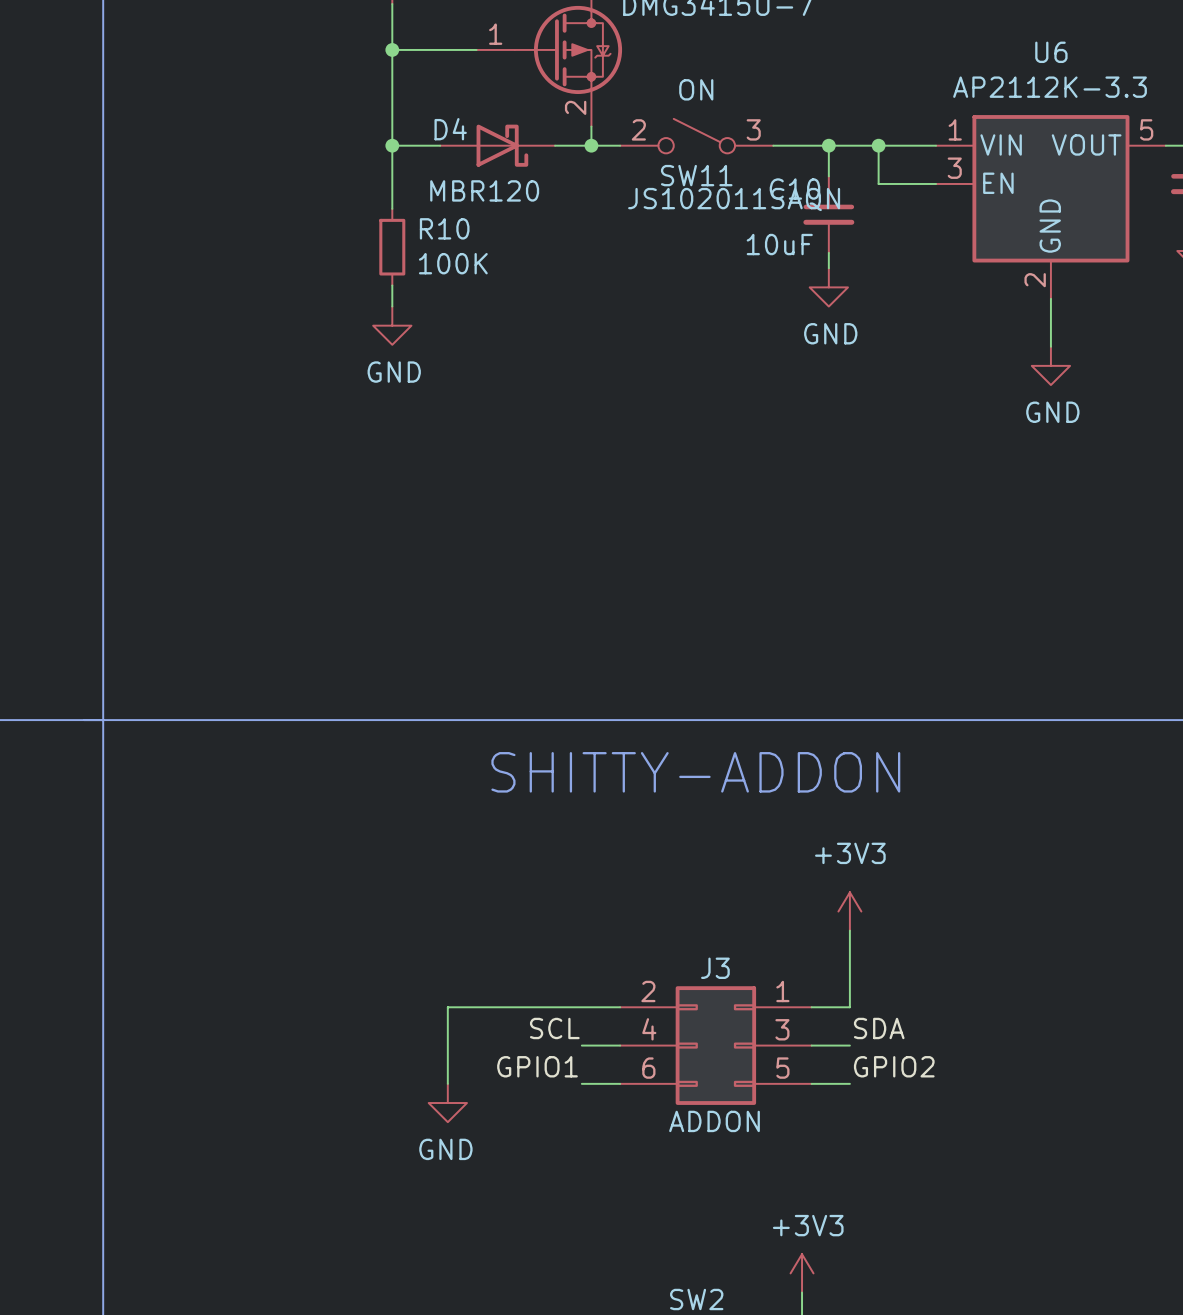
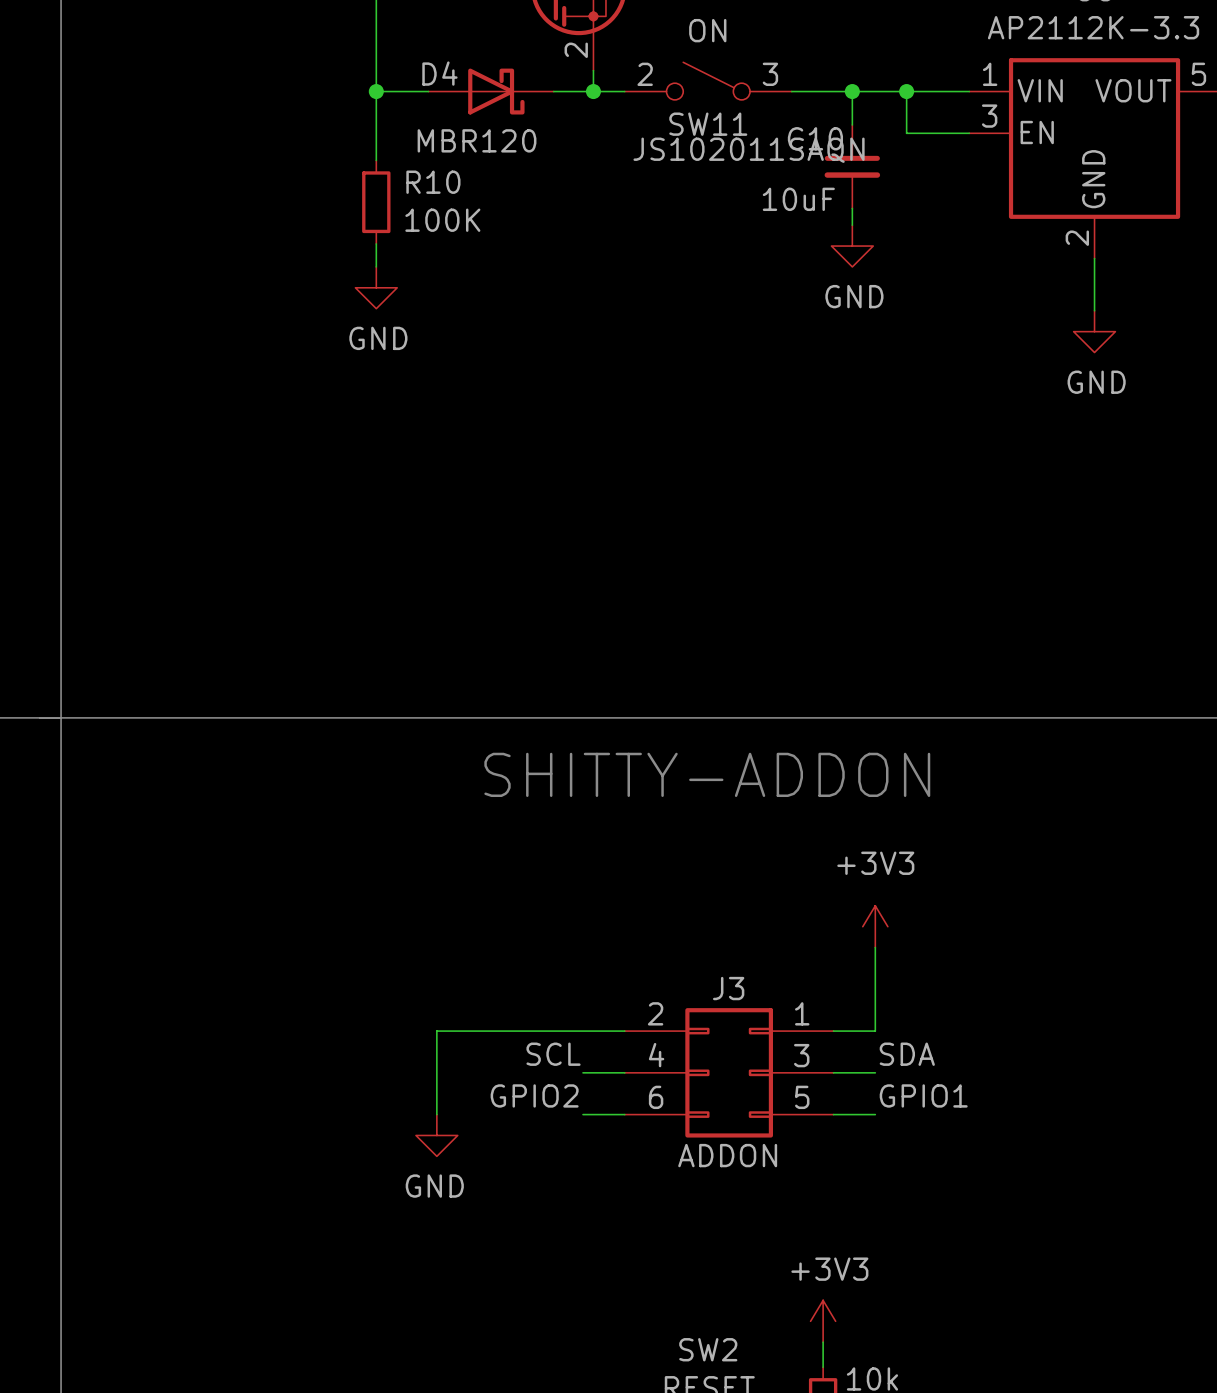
label: GPIO1 (537, 1066) -> GPIO2 (534, 1095)
label: GPIO2 (894, 1066) -> GPIO1 (923, 1095)

